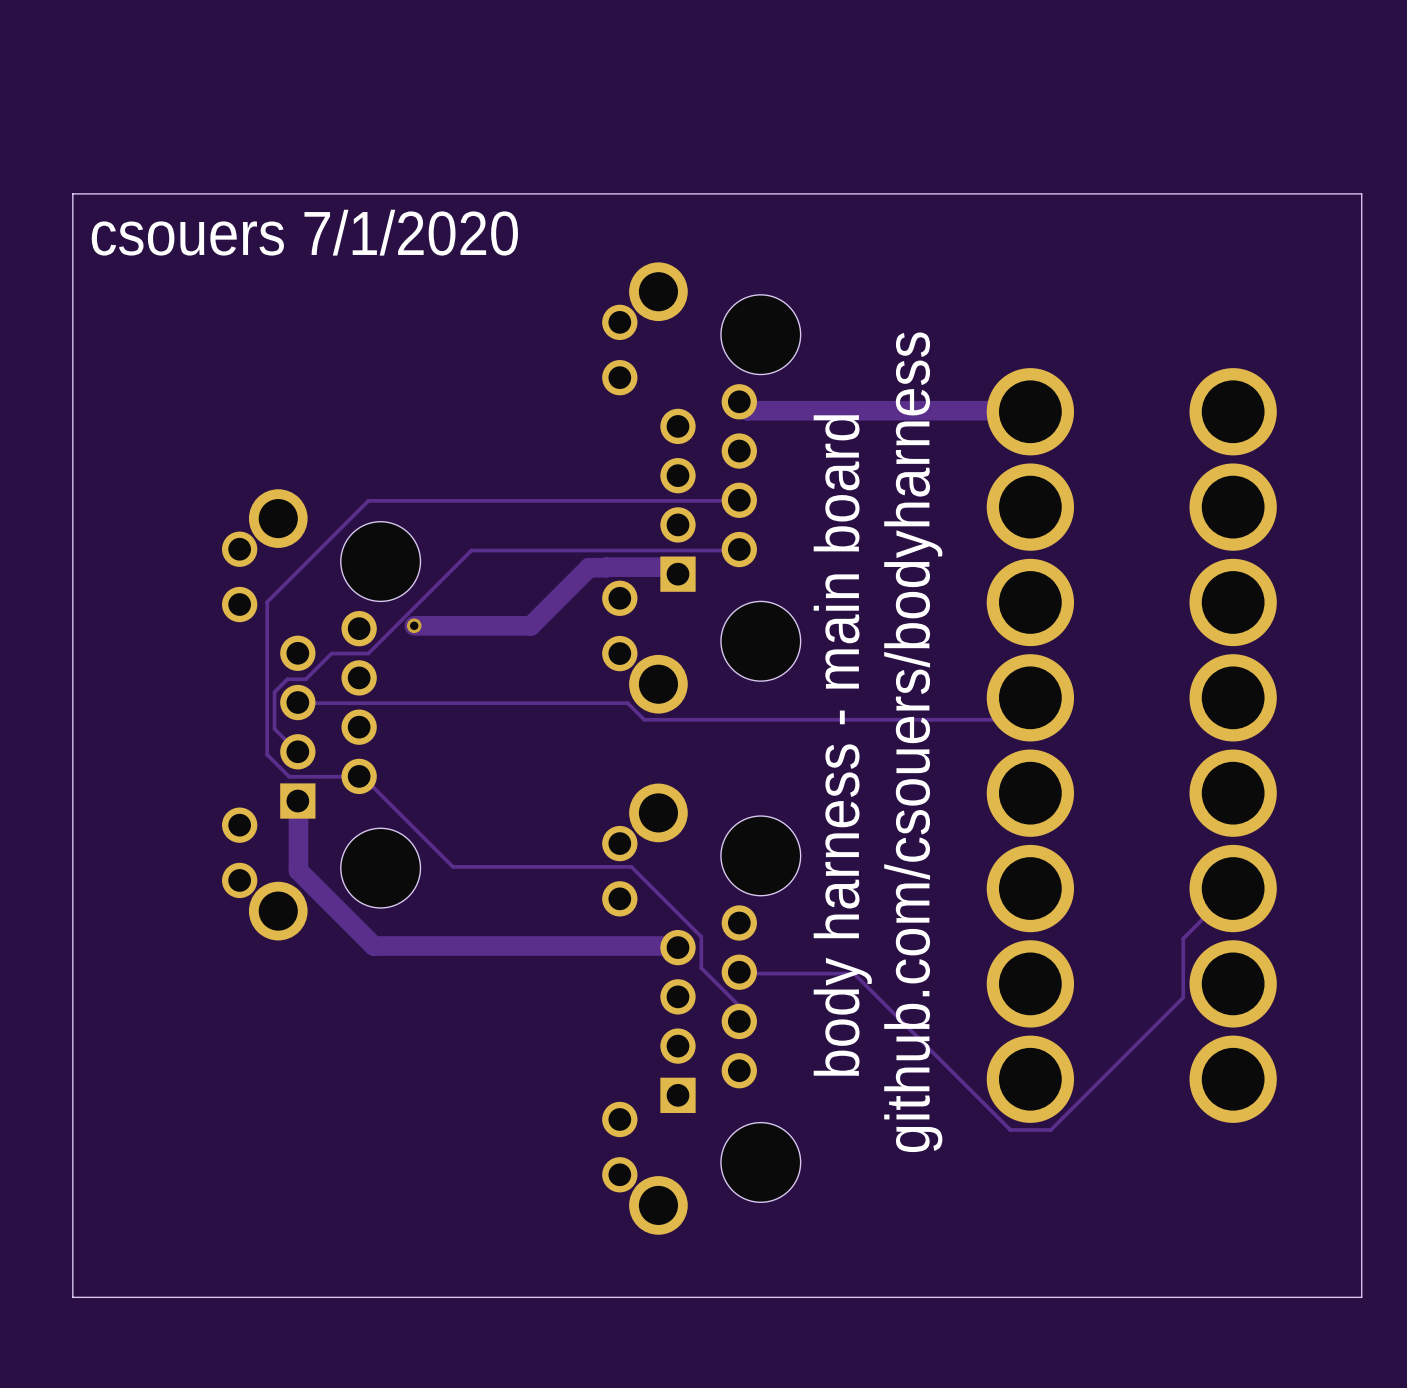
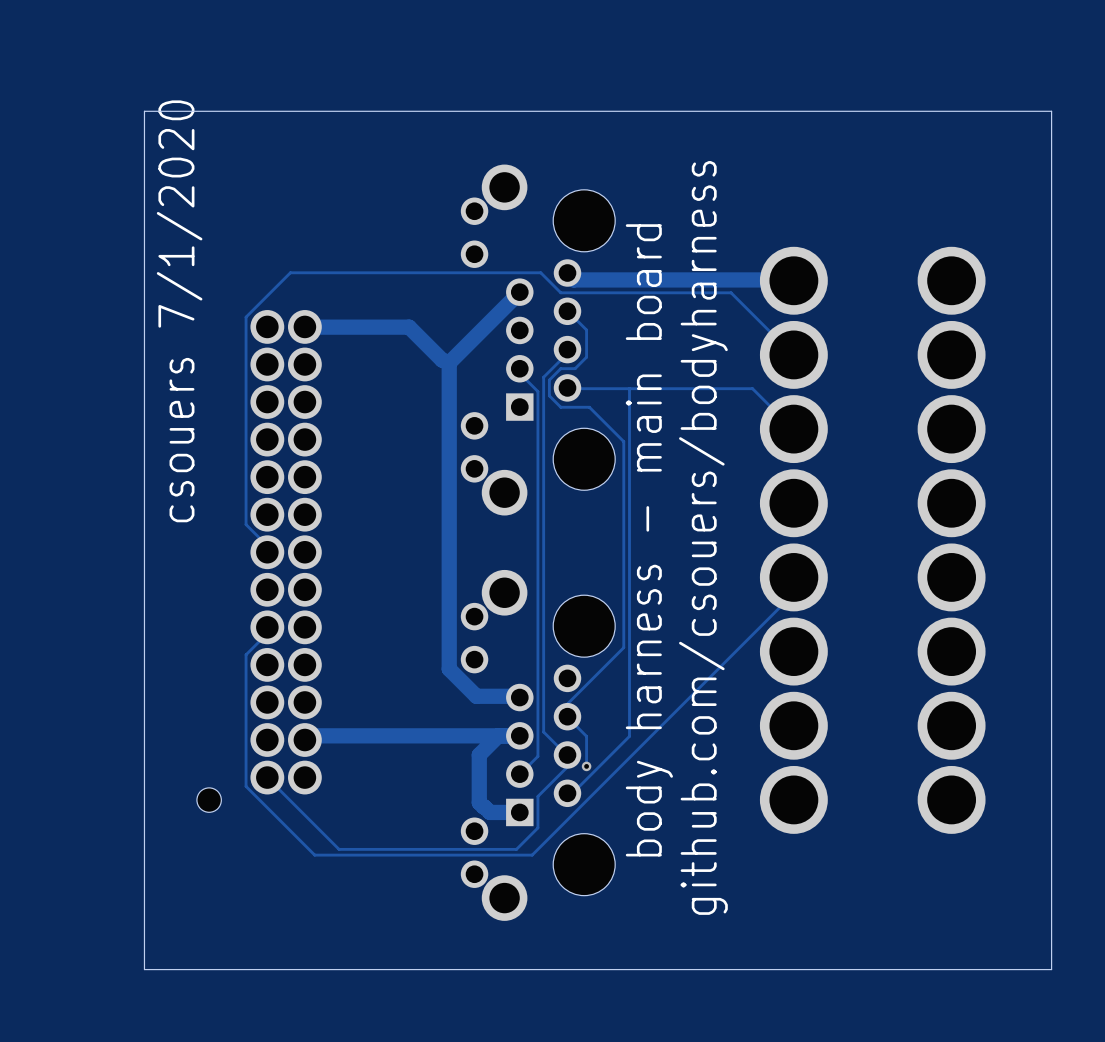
board edge: (195, 193) (72, 193) (72, 1297) (195, 1297) -> (144, 111) (144, 969)
text rotation: 0° (304, 232) -> 90° counterclockwise (179, 311)
track: none -> (519, 292) (449, 362)
track: none -> (567, 311) (586, 330) (586, 357) (575, 368) (560, 368) (549, 380) (549, 395) (560, 407) (589, 407) (623, 441) (623, 647) (567, 703) (567, 716)
track: none -> (304, 326) (409, 327) (442, 360) (449, 362)
track: (738, 500) (368, 500) (267, 602) (267, 754) (289, 776) (359, 776) -> (566, 350) (566, 354) (543, 377) (543, 732) (566, 754)
track: none -> (793, 354) (731, 292) (560, 292) (540, 272) (290, 272) (246, 317) (246, 524) (266, 544) (267, 552)
track: (739, 549) (471, 550) (368, 653) (331, 653) (305, 679) (287, 679) (274, 692) (274, 728) (297, 751) -> (567, 387) (752, 388) (793, 429)
track: none -> (629, 388) (629, 736) (573, 792) (567, 793)
track: (677, 574) (671, 567) (589, 567) (531, 625) (414, 625) -> none
via: (414, 625) -> none
track: (1030, 697) (1008, 719) (644, 719) (627, 703) (297, 702) -> none
part: (321, 714) -> none
part: none -> (259, 561)
track: (359, 776) (362, 776) (452, 866) (631, 866) (701, 936) -> (519, 368) (520, 374) (537, 391) (537, 689)
track: none -> (793, 577) (792, 594) (532, 855) (314, 855) (246, 786) (246, 654) (266, 634) (267, 627)
track: (297, 801) (298, 870) (373, 946) (622, 946) -> (449, 362) (449, 669) (476, 696)
track: (1233, 888) (1183, 938) (1183, 997) (1050, 1129) (1010, 1129) (854, 973) (739, 973) -> (586, 766) (586, 736) (567, 717)
track: (701, 968) (738, 1004) (738, 1021) -> (537, 713) (537, 756) (519, 774)
track: none -> (498, 735) (479, 754) (479, 802) (490, 812) (519, 812)
track: none -> (519, 735) (309, 735) (304, 740)
track: none -> (567, 754) (566, 767) (537, 796) (537, 827) (516, 849) (339, 849) (267, 777)
via: none -> (586, 766)

